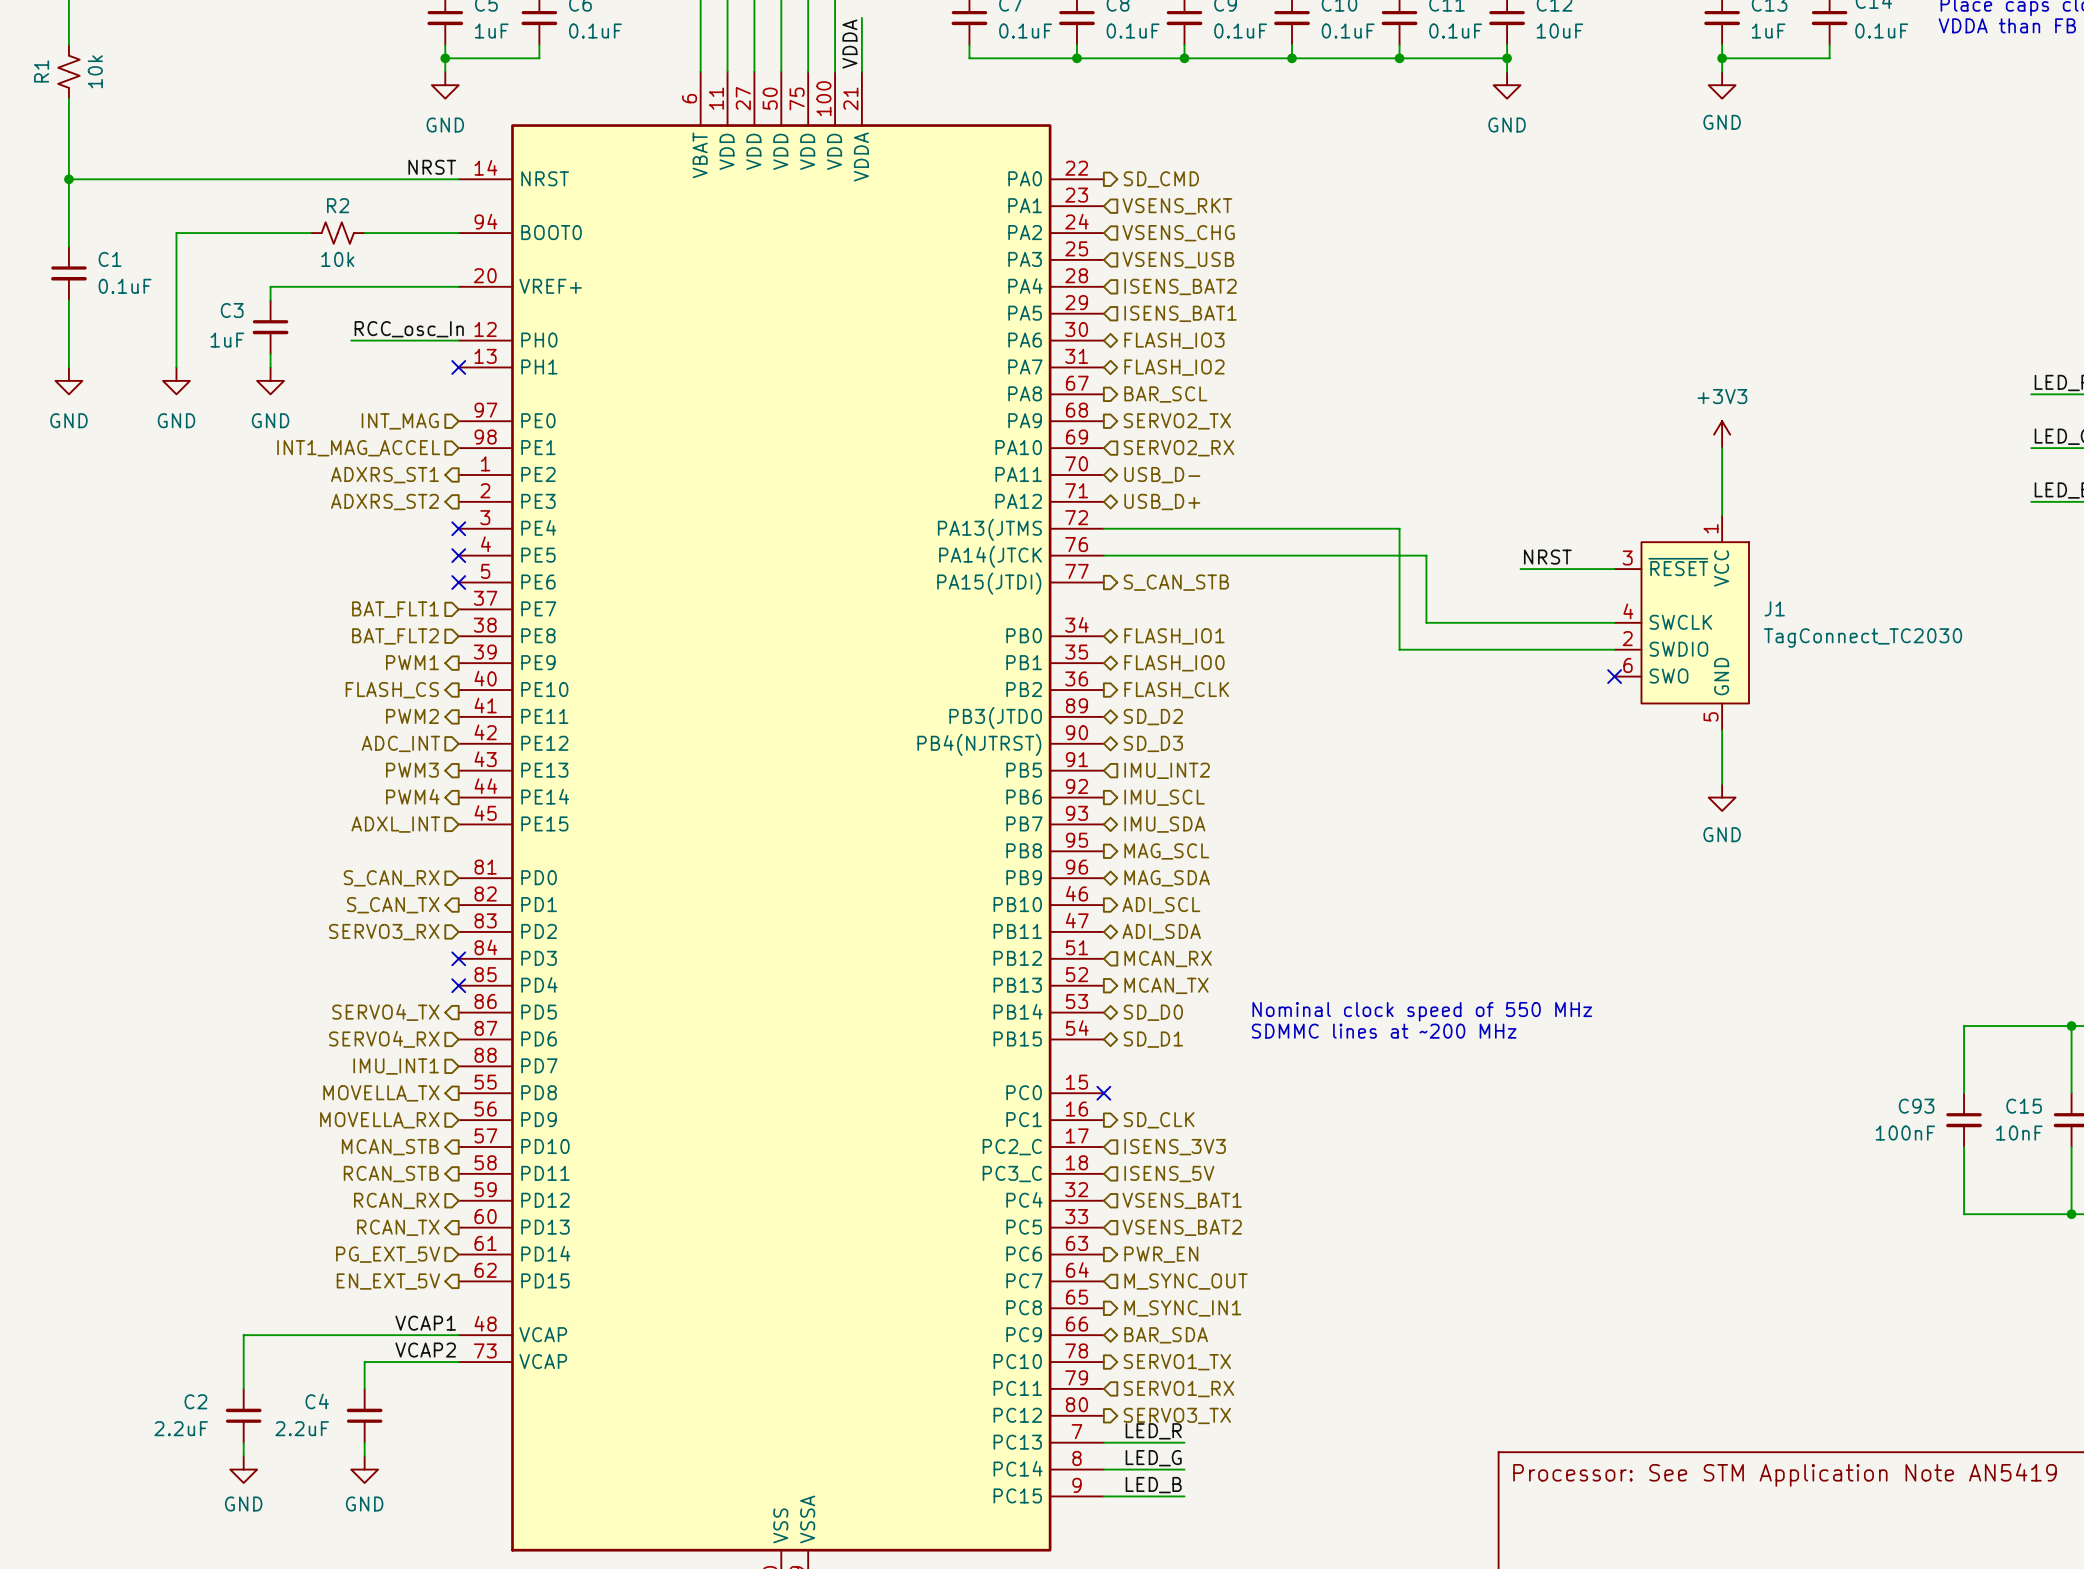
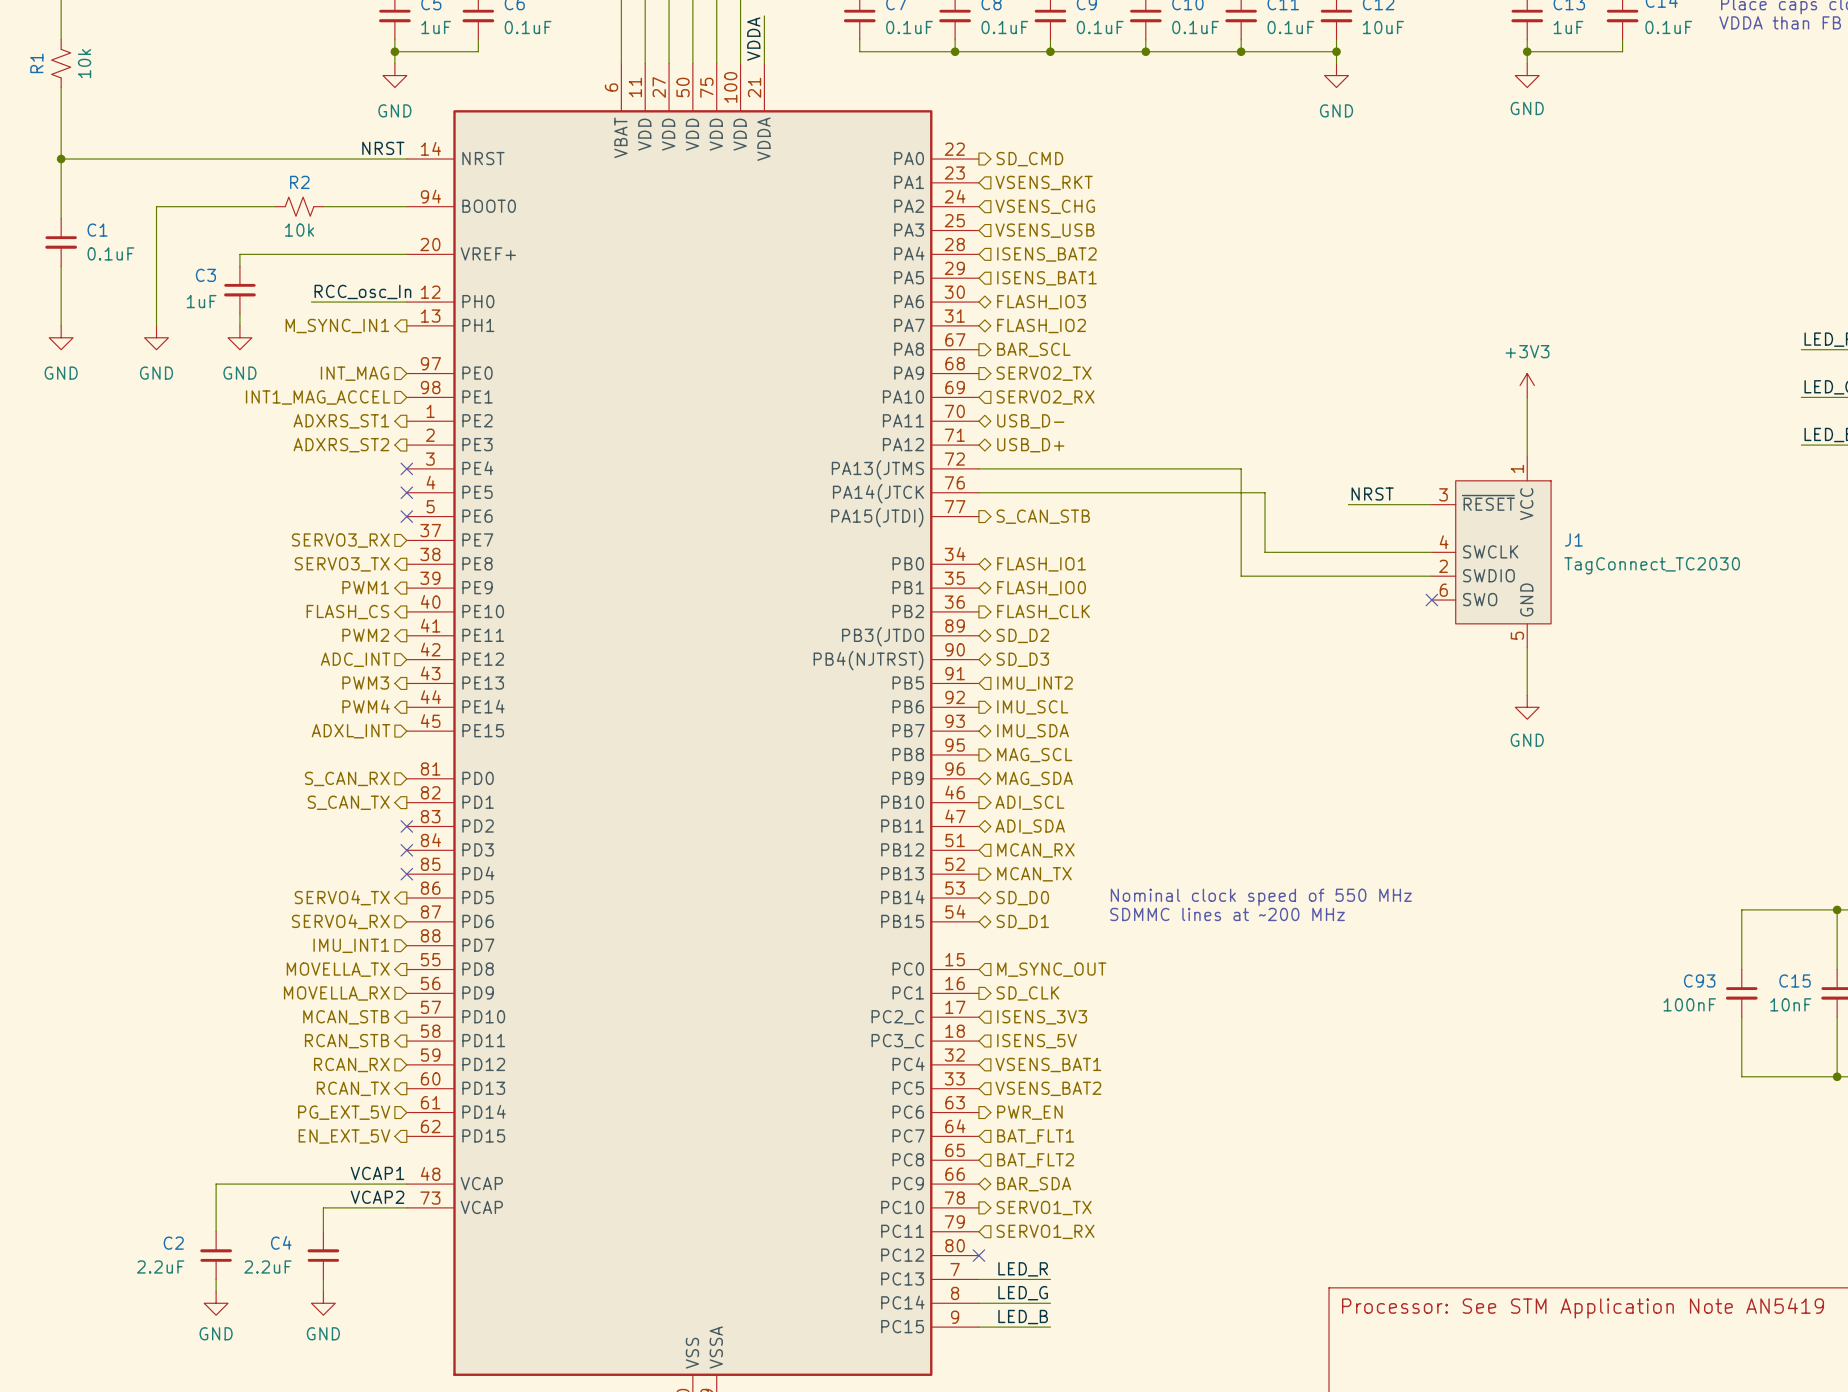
hierarchical label: none -> M_SYNC_IN1 (337, 326)
no-connect mark: (458, 367) -> none
hierarchical label: BAT_FLT1 (395, 609) -> SERVO3_RX (340, 540)
hierarchical label shape: input (395, 636) -> output (342, 564)
hierarchical label: BAT_FLT2 (395, 636) -> SERVO3_TX (342, 564)
no-connect mark: none -> (406, 826)
hierarchical label: SERVO3_RX (384, 932) -> none
no-connect mark: (1103, 1093) -> none
hierarchical label: none -> M_SYNC_OUT (1051, 969)
hierarchical label: M_SYNC_OUT (1185, 1281) -> BAT_FLT1 (1035, 1136)
hierarchical label shape: output (1182, 1308) -> input (1035, 1160)
hierarchical label: M_SYNC_IN1 (1182, 1308) -> BAT_FLT2 (1035, 1160)
no-connect mark: none -> (978, 1255)
hierarchical label: SERVO3_TX (1177, 1415) -> none

